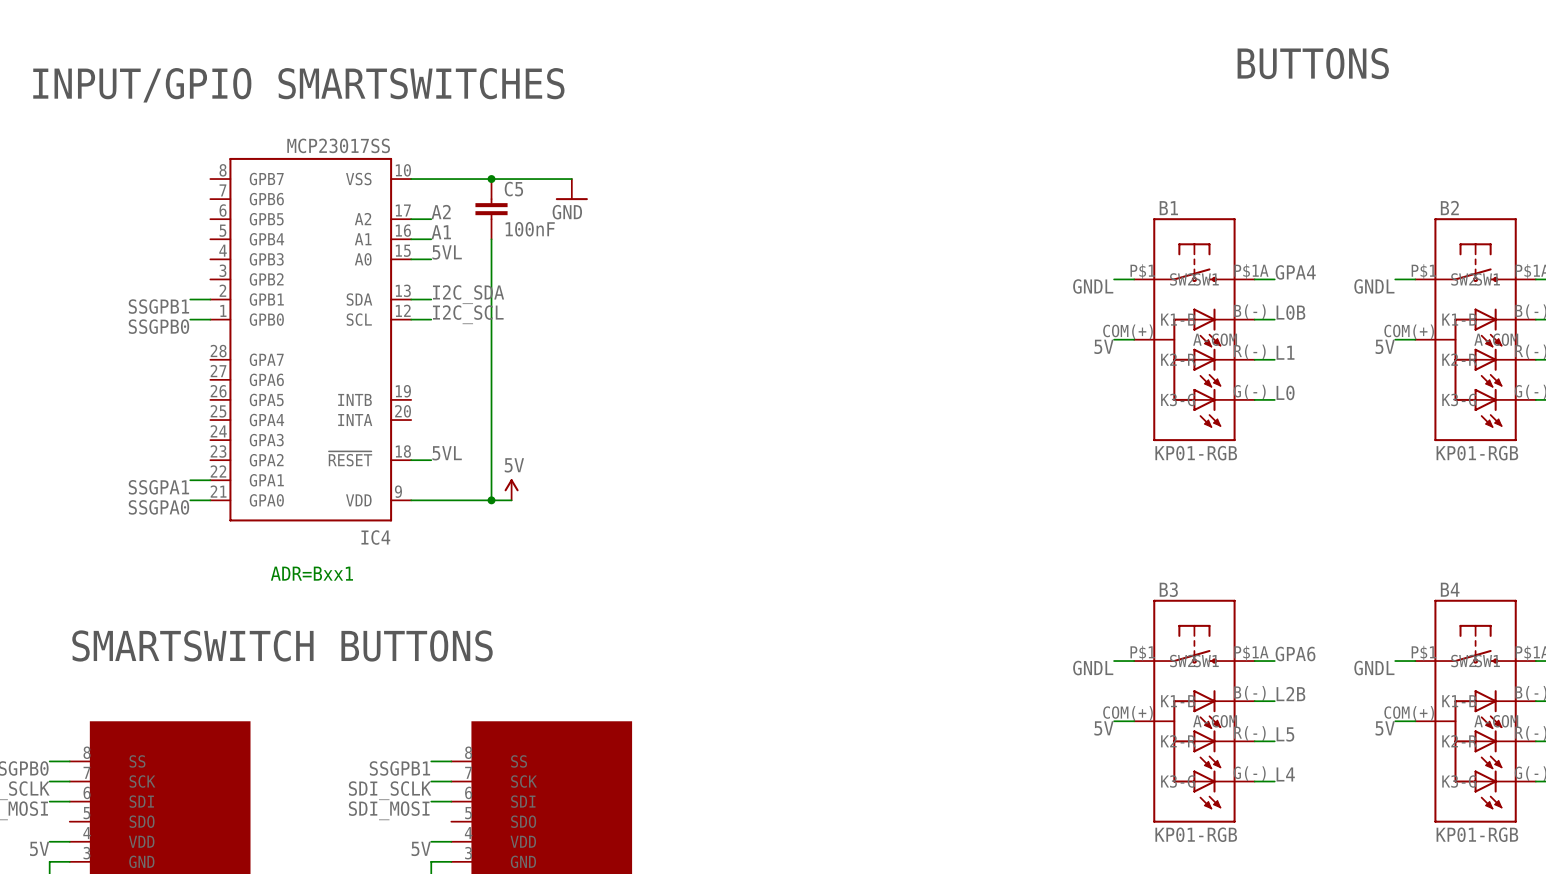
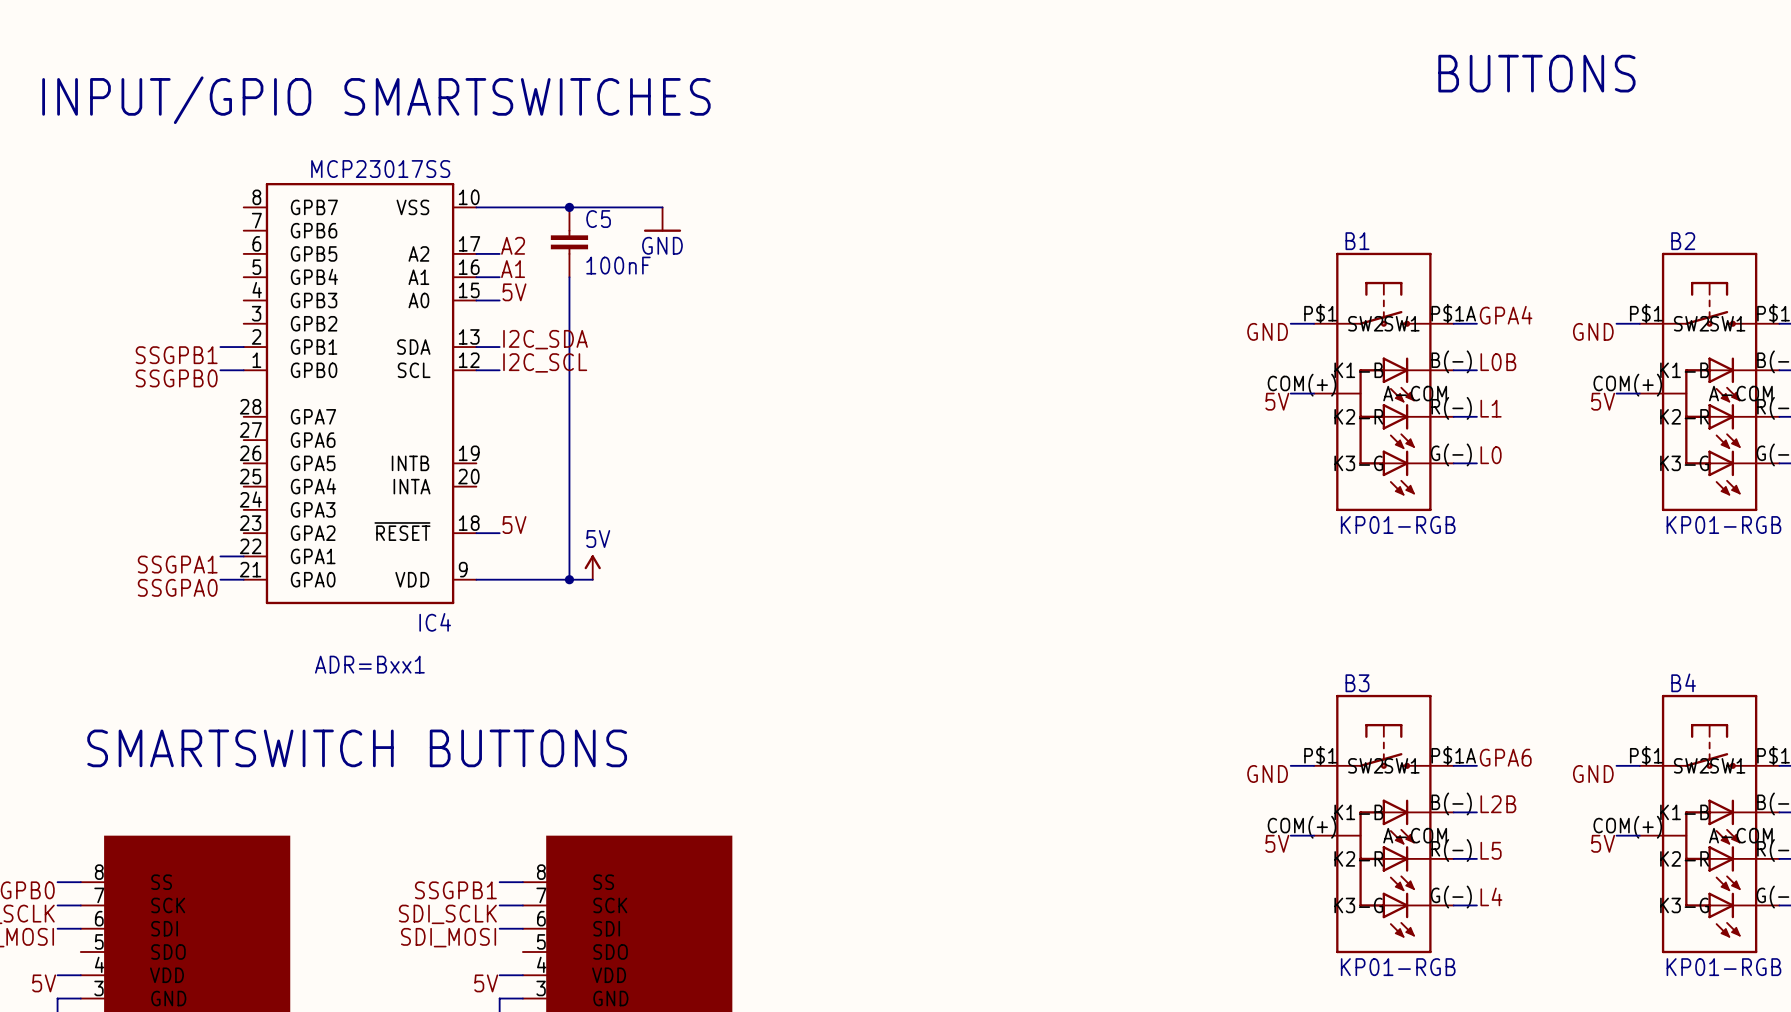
label: 5VL (447, 252) -> 5V (514, 292)
label: GNDL (1093, 286) -> GND (1267, 331)
label: GNDL (1374, 286) -> GND (1593, 331)
label: 5VL (447, 453) -> 5V (514, 525)
label: GNDL (1093, 668) -> GND (1267, 773)
label: GNDL (1374, 668) -> GND (1593, 773)

